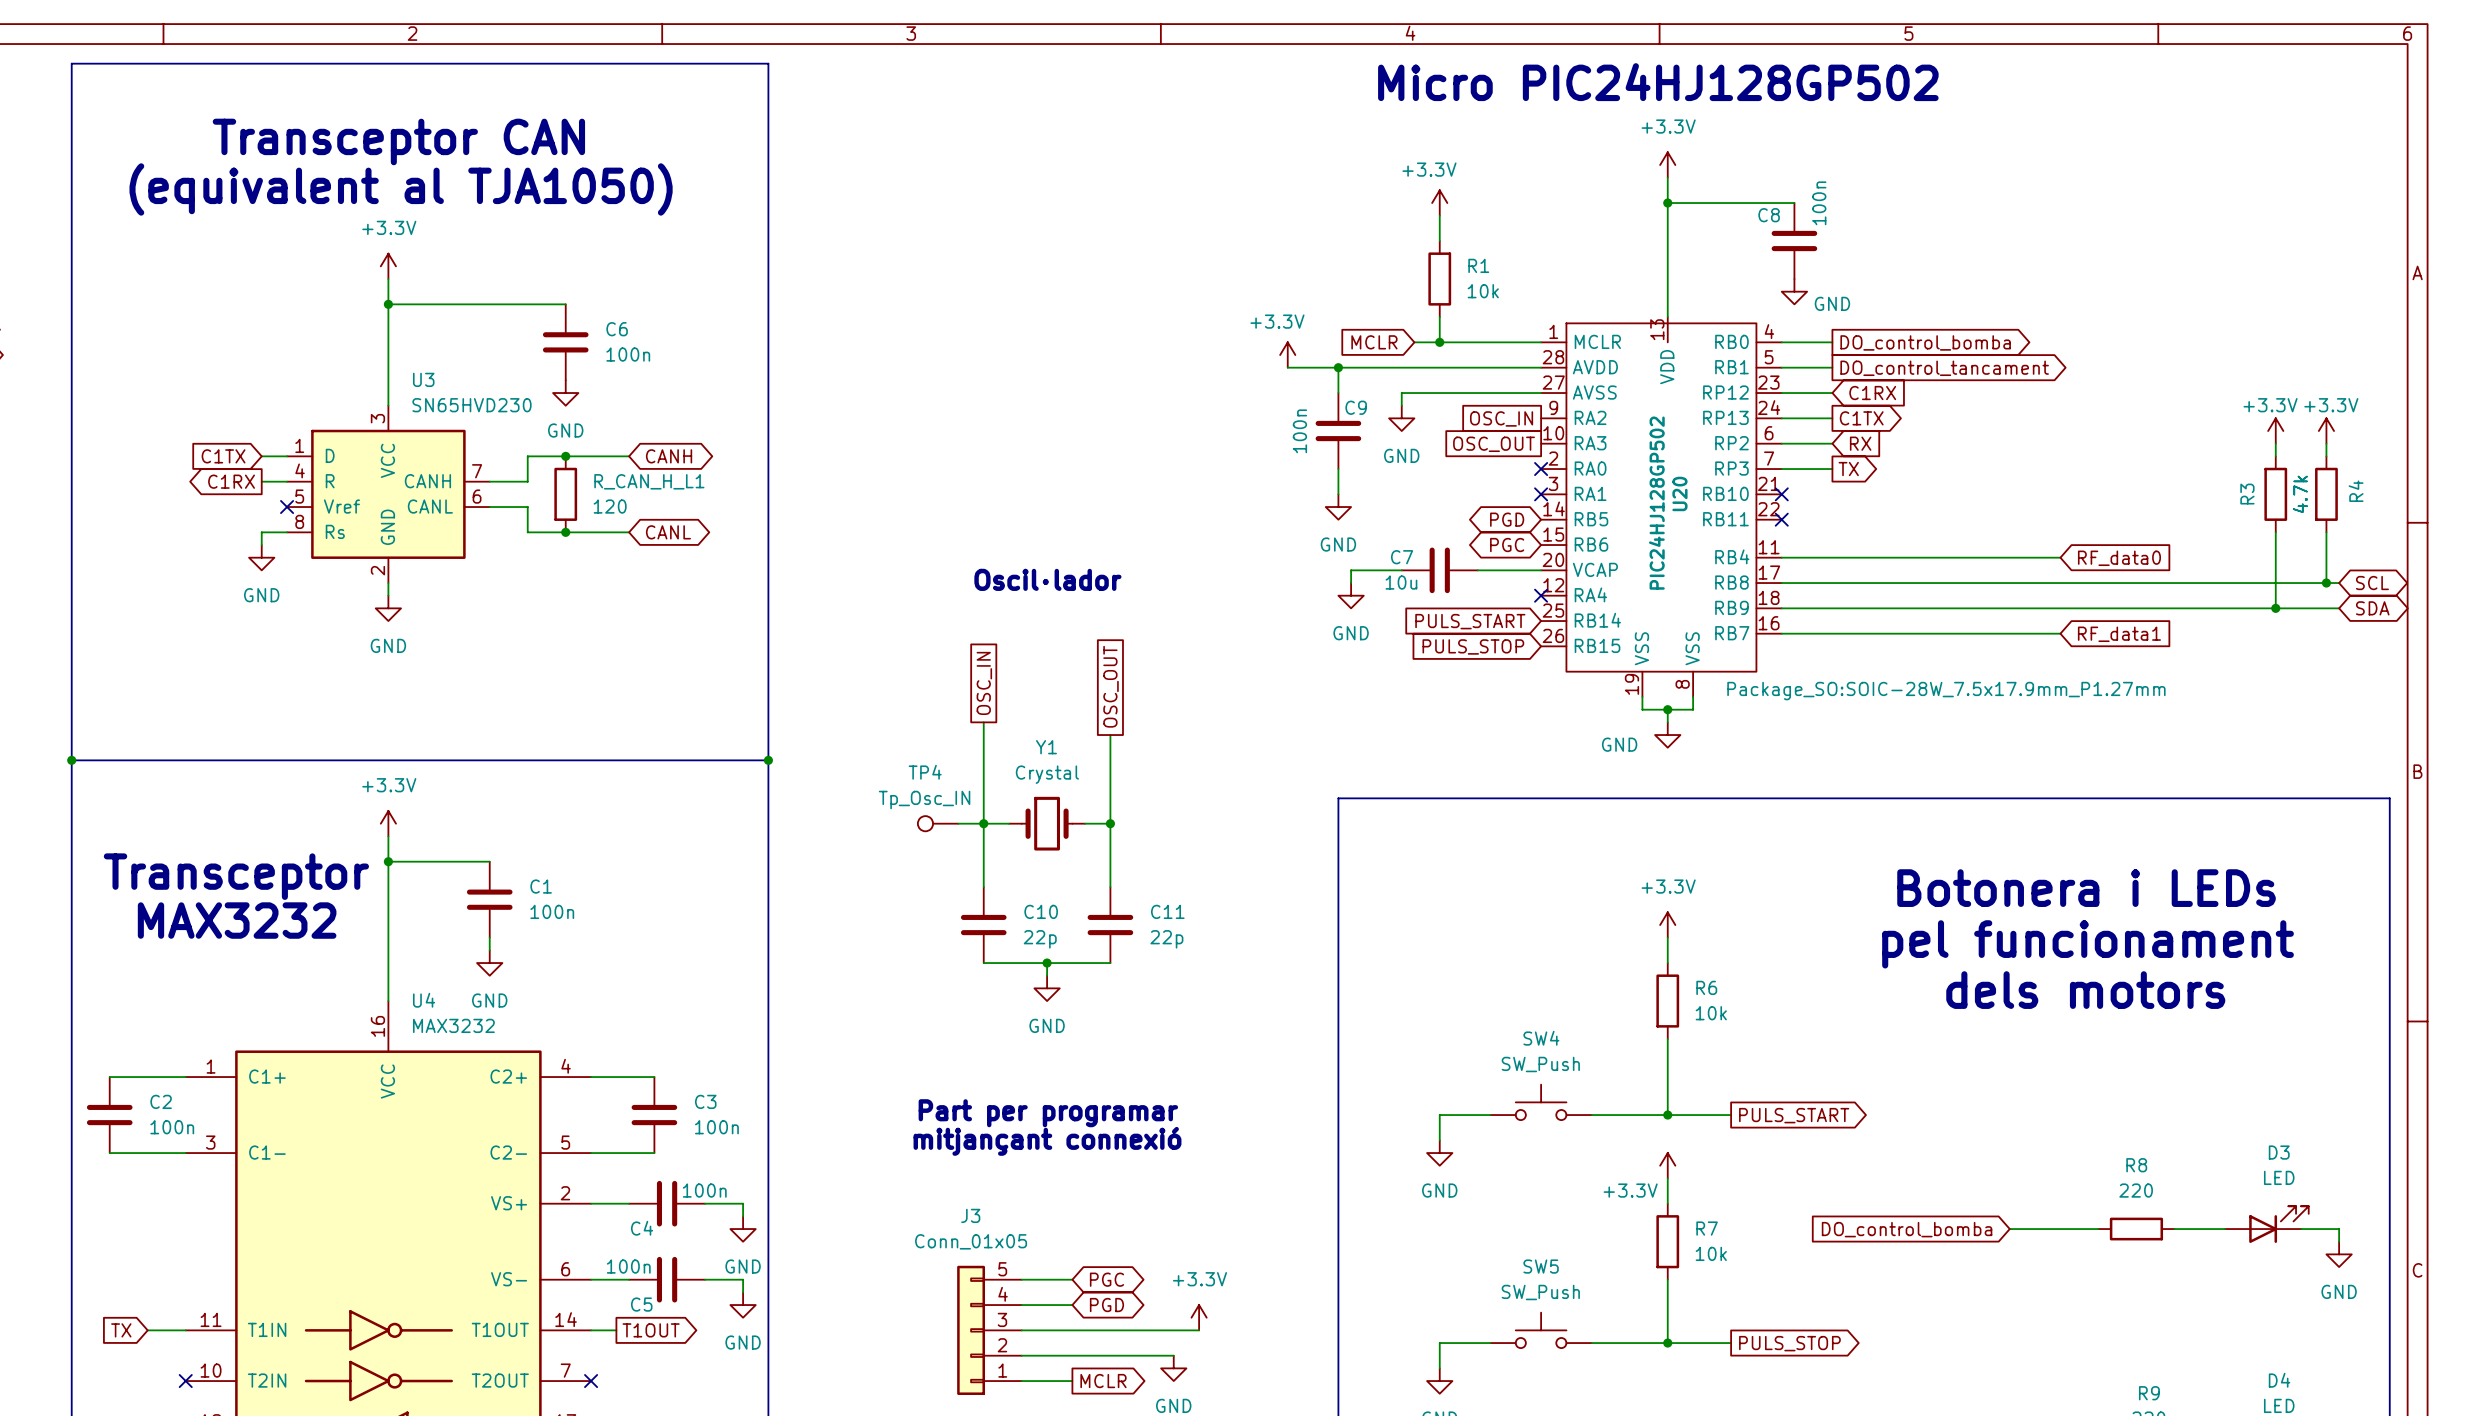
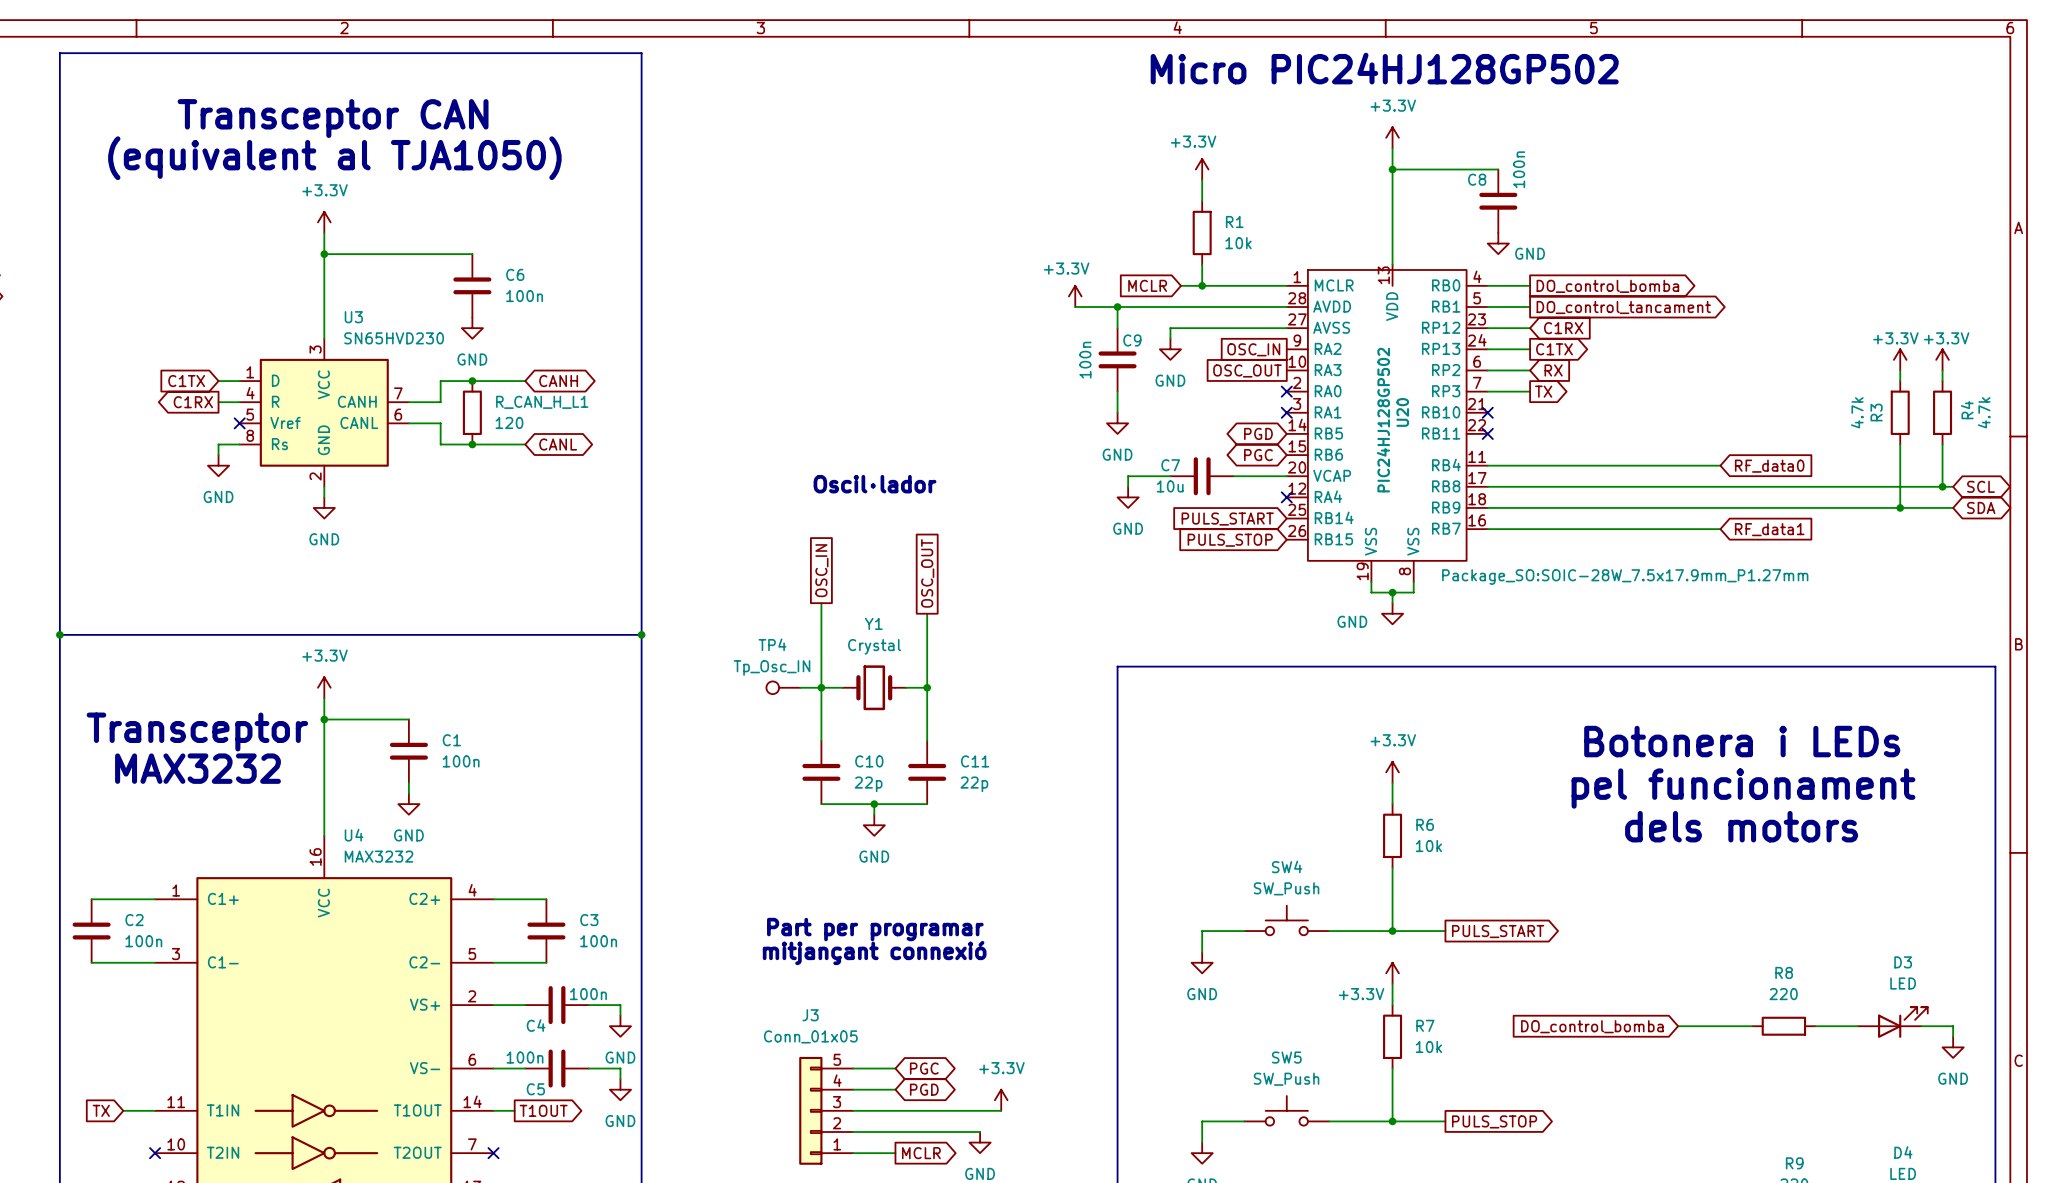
R3 value position: 4.7k (2300, 494) -> 4.7k (1857, 412)
R4 value position: 4.7k (2300, 494) -> 4.7k (1984, 412)

